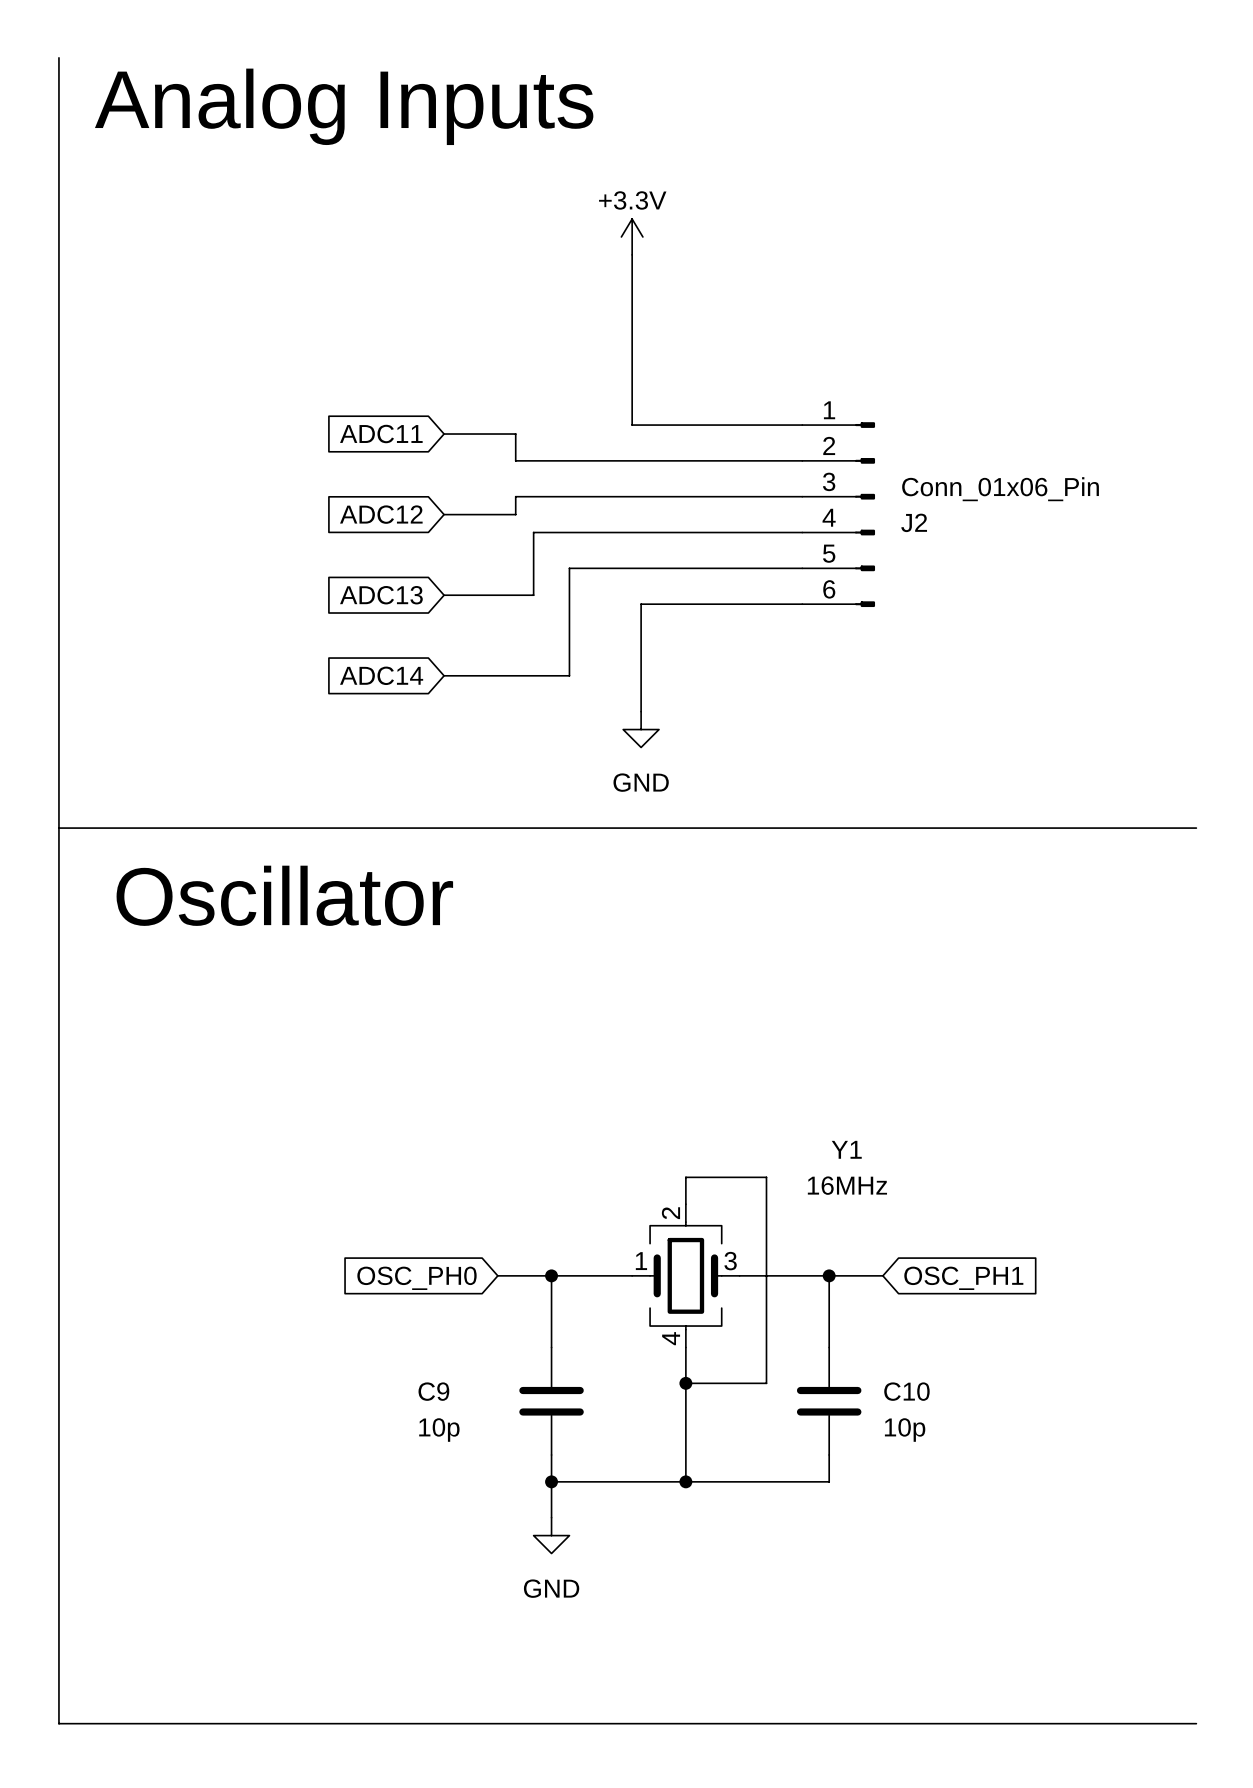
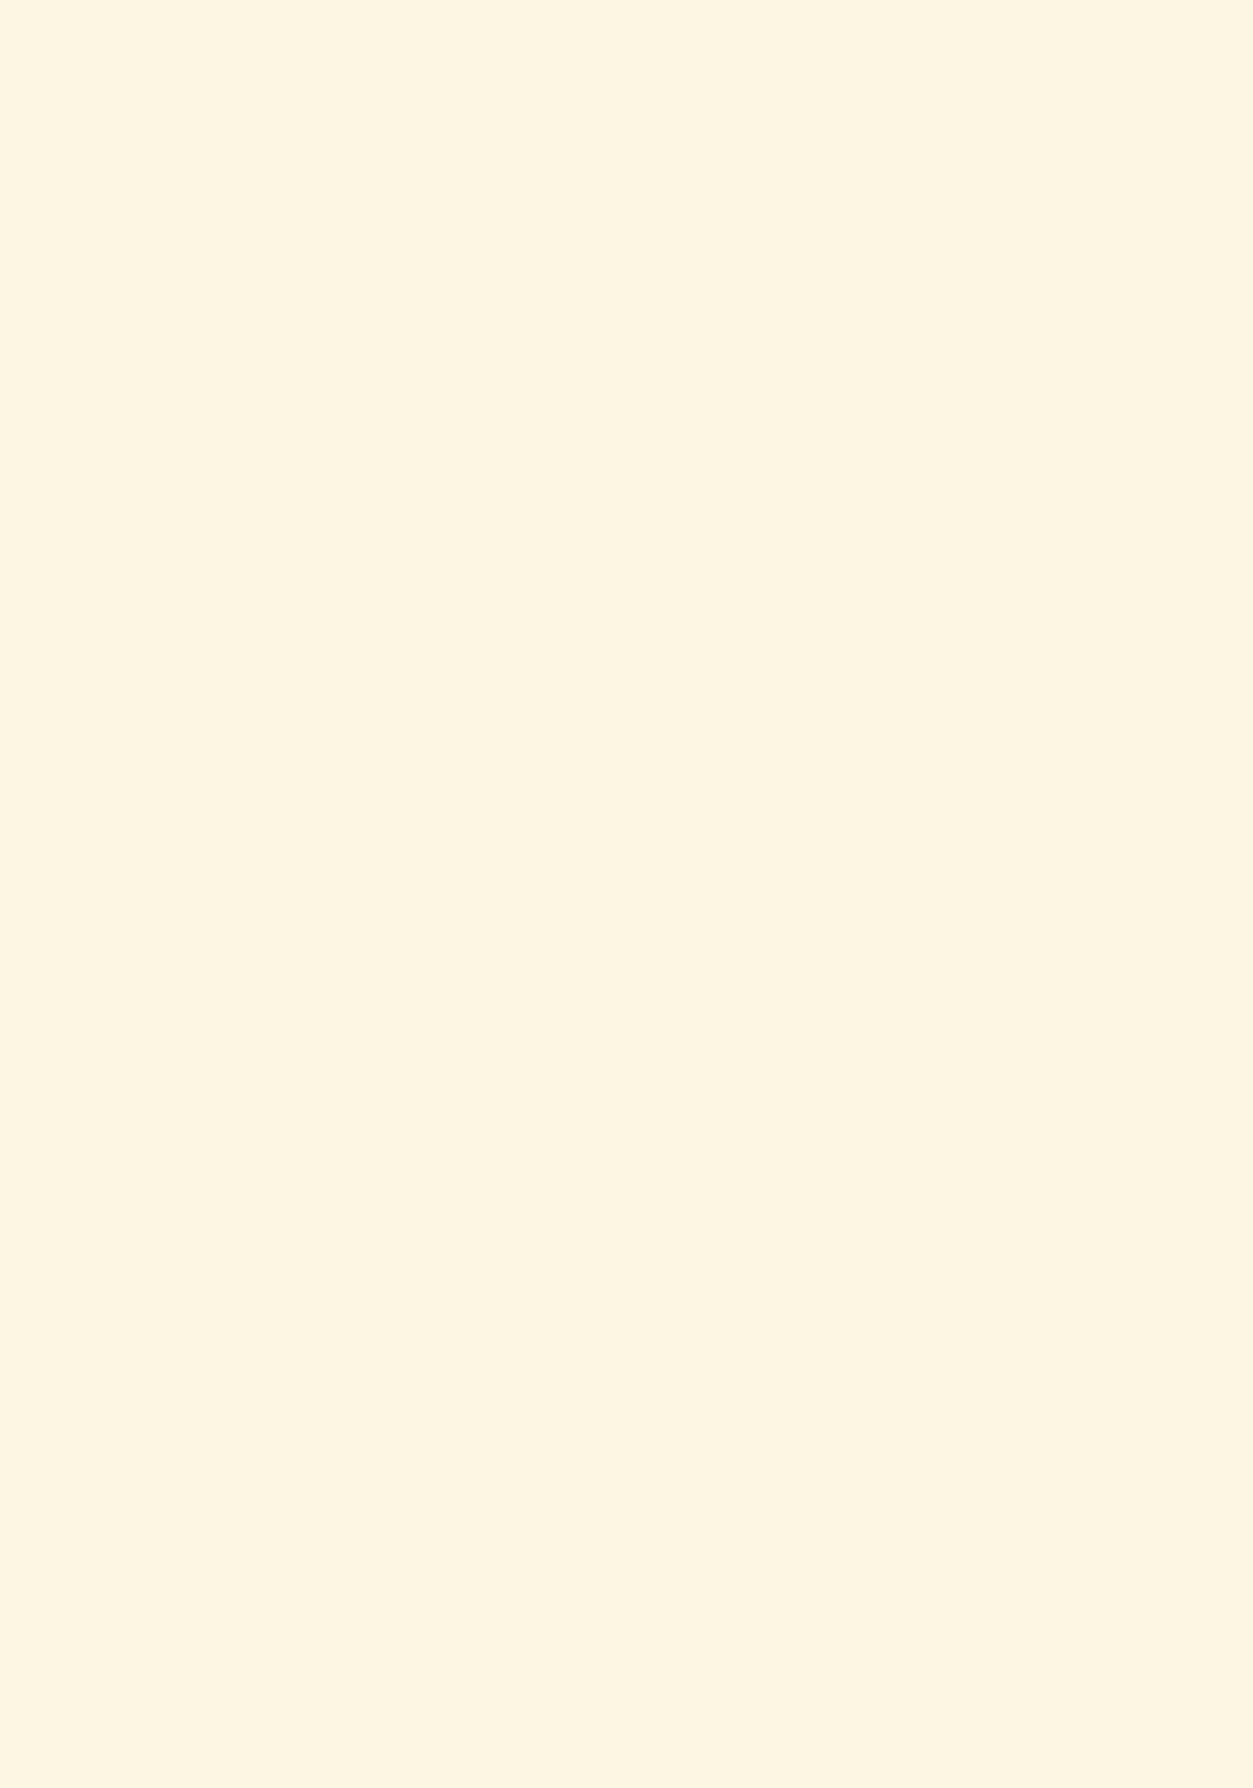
line: (58, 57) (58, 1723) (1196, 1723) -> none
text: Analog Inputs (344, 106) -> none
power symbol: +3.3V (632, 236) -> none
wire: (632, 254) (632, 425) (802, 425) -> none
global label: ADC11 (381, 434) -> none
wire: (444, 434) (515, 434) (515, 460) (802, 460) -> none
wire: (802, 496) (515, 496) (515, 514) (444, 514) -> none
global label: ADC12 (381, 514) -> none
J2: Conn_01x06_Pin (838, 514) -> none
wire: (802, 532) (533, 532) (533, 595) (444, 595) -> none
wire: (802, 568) (569, 568) (569, 675) (444, 675) -> none
global label: ADC13 (381, 595) -> none
wire: (802, 604) (641, 604) (641, 711) -> none
global label: ADC14 (381, 675) -> none
power symbol: GND (641, 729) -> none
line: (58, 828) (1196, 828) -> none
text: Oscillator (284, 895) -> none
wire: (685, 1204) (685, 1177) (766, 1177) (766, 1383) (685, 1383) -> none
wire: (497, 1275) (632, 1275) -> none
wire: (551, 1275) (551, 1347) -> none
junction: (551, 1275) -> none
Y1: 16MHz (685, 1275) -> none
wire: (739, 1275) (882, 1275) -> none
wire: (829, 1275) (829, 1347) -> none
junction: (829, 1275) -> none
global label: OSC_PH0 (416, 1278) -> none
global label: OSC_PH1 (963, 1278) -> none
wire: (685, 1347) (685, 1481) -> none
junction: (685, 1383) -> none
C9: 10p (551, 1401) -> none
C10: 10p (829, 1401) -> none
wire: (551, 1454) (551, 1517) -> none
wire: (829, 1454) (829, 1481) (551, 1481) -> none
junction: (551, 1481) -> none
junction: (685, 1481) -> none
power symbol: GND (551, 1535) -> none

